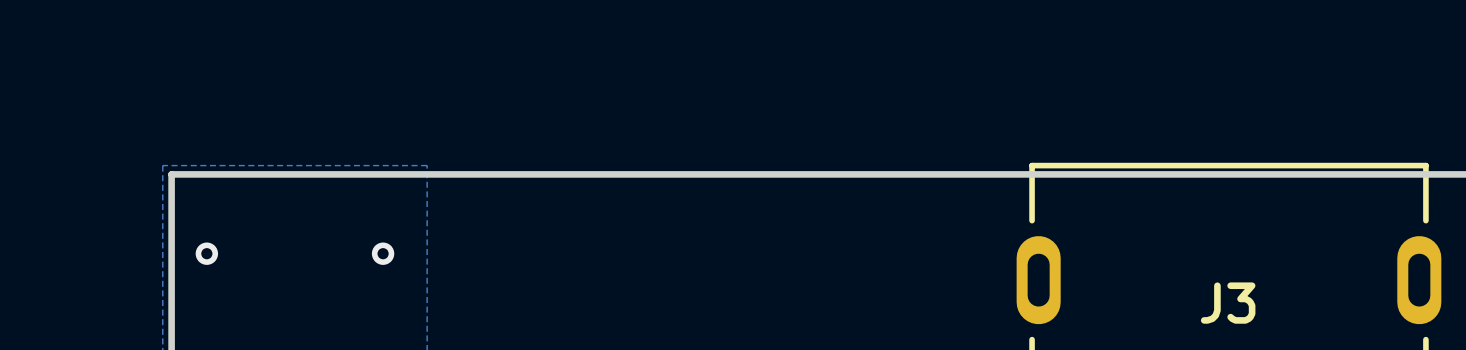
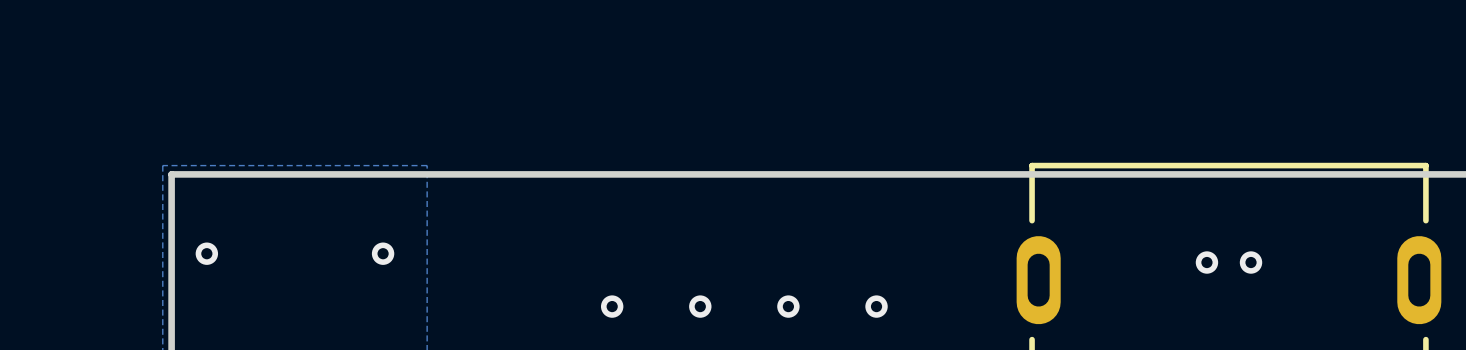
via: none -> (1206, 262)
via: none -> (1251, 262)
J3 name: J3 (1228, 303) -> none
via: none -> (612, 306)
via: none -> (700, 306)
via: none -> (788, 306)
via: none -> (876, 306)

